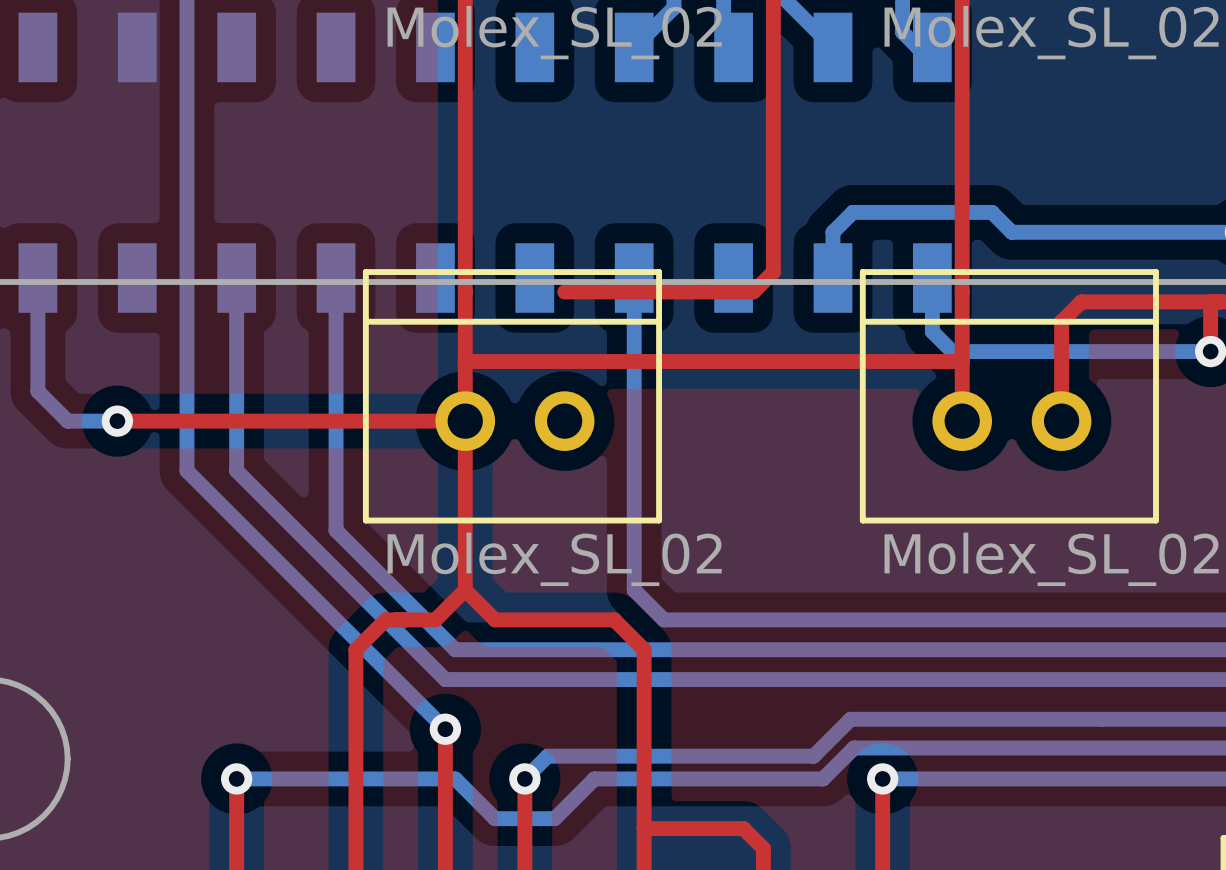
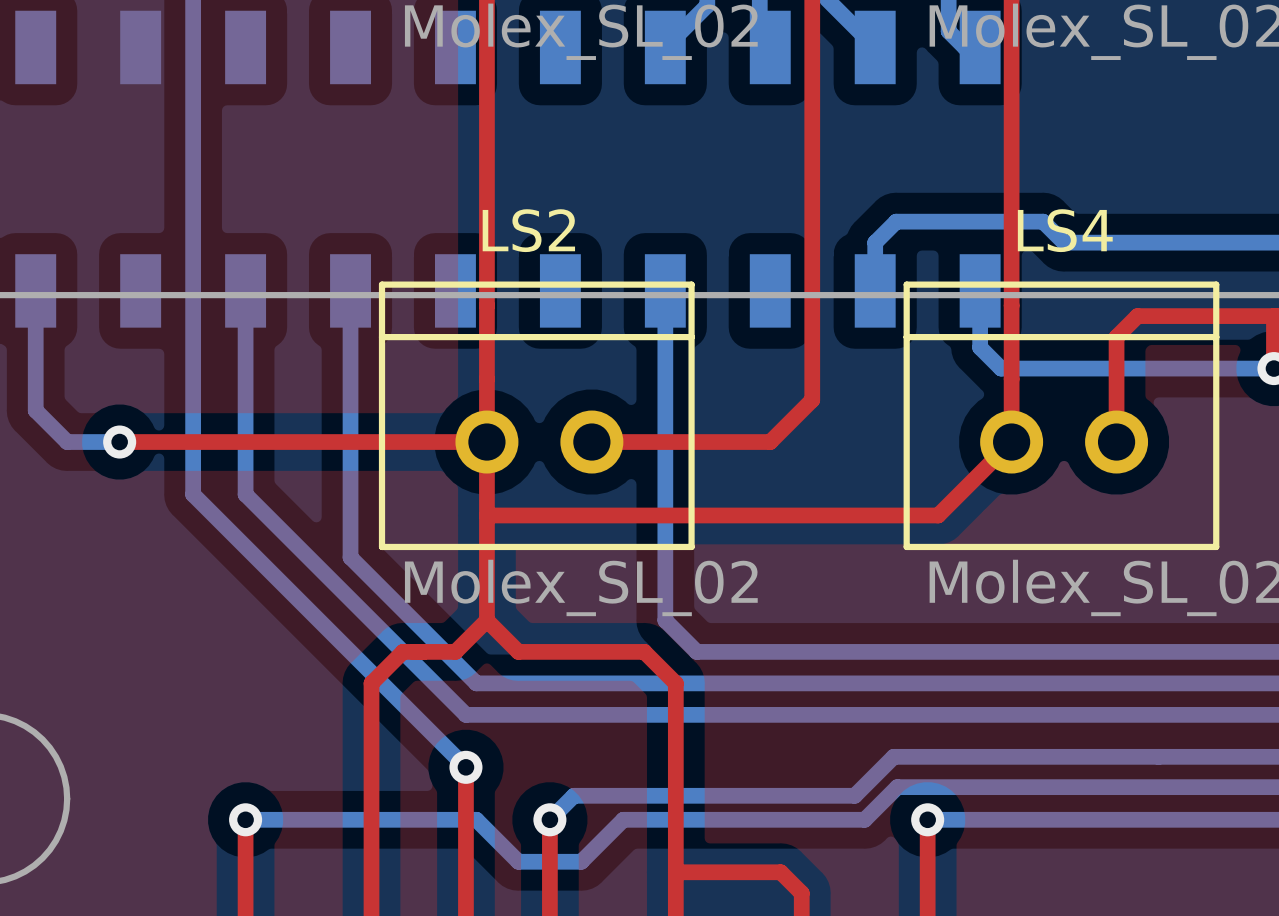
text: none -> LS2 (528, 230)
text: none -> LS4 (1065, 230)
top track: (773, 272) (753, 291) (564, 291) -> (812, 284) (812, 400) (770, 442) (591, 442)
top track: (465, 361) (962, 361) -> none
top track: none -> (1011, 442) (938, 515) (486, 515)

